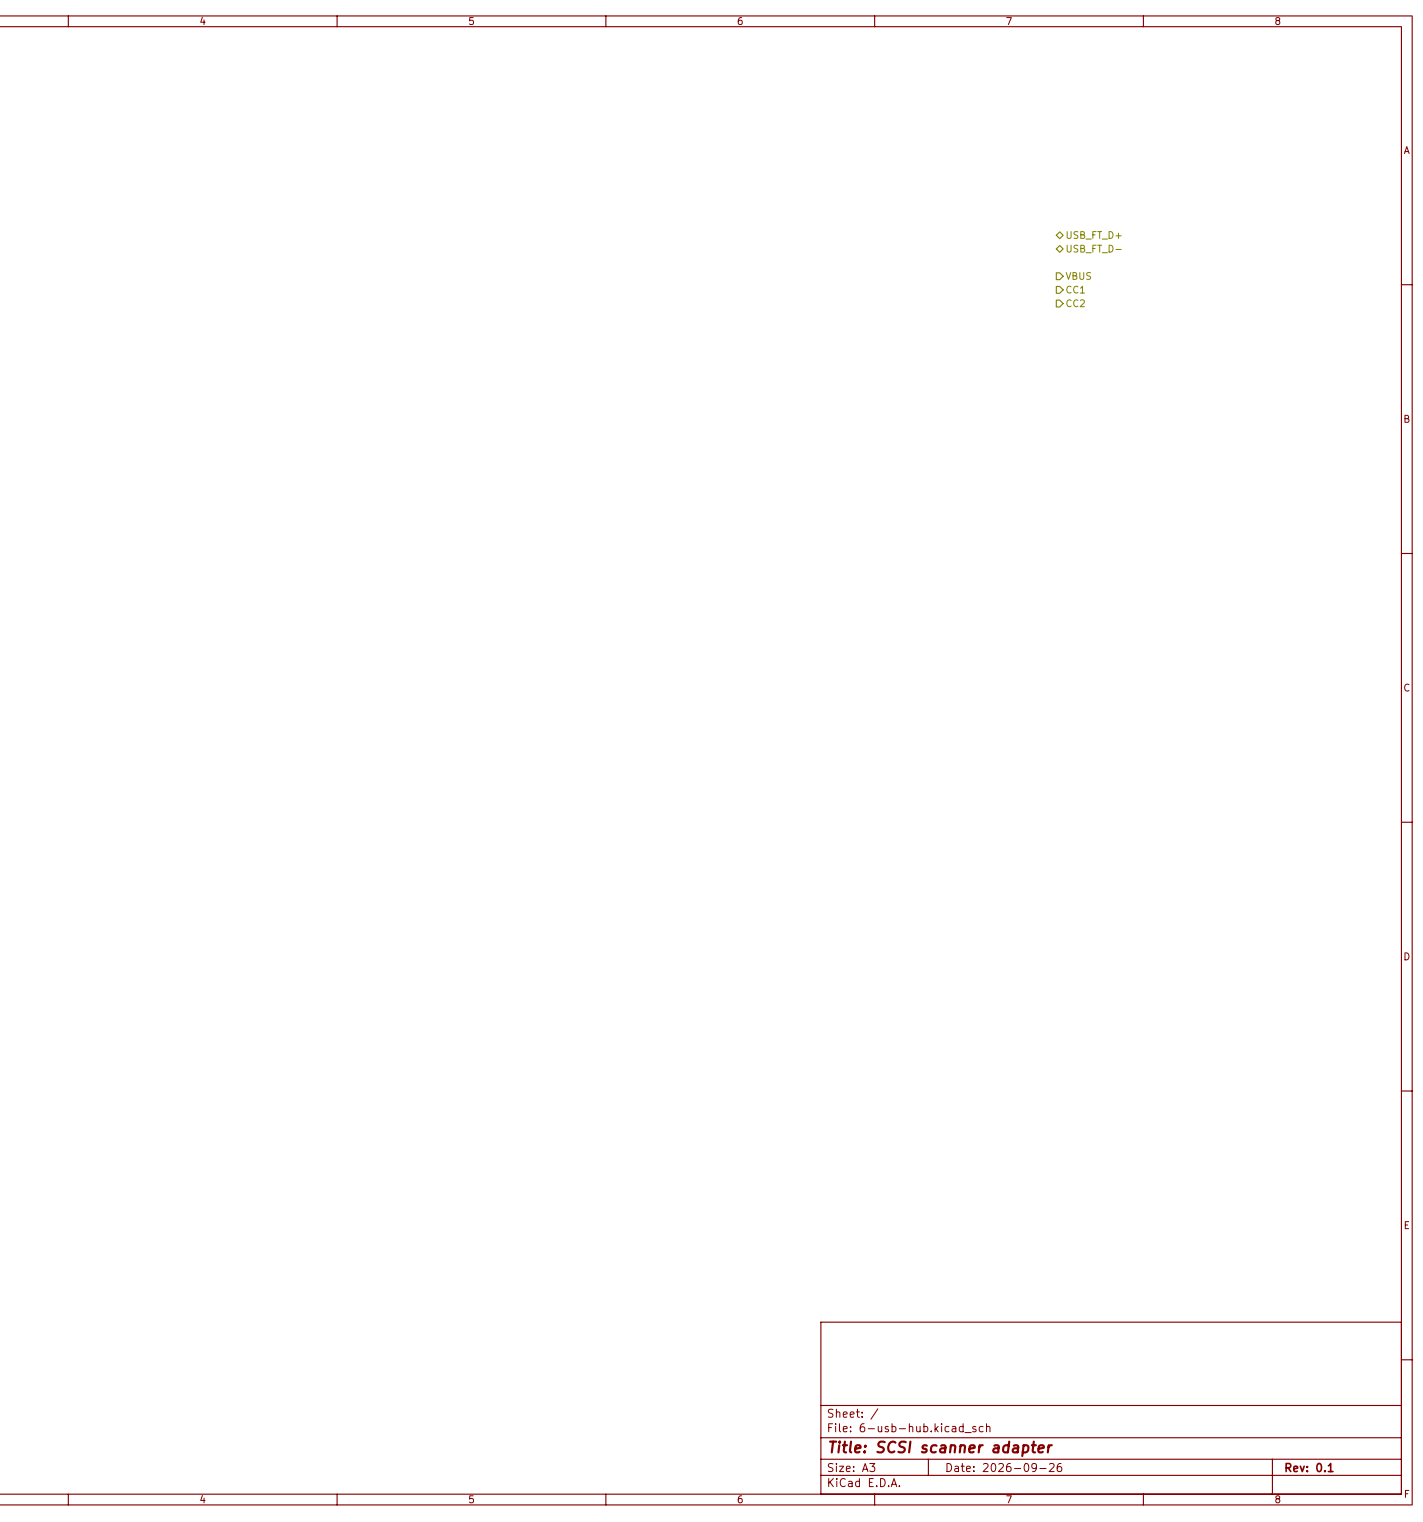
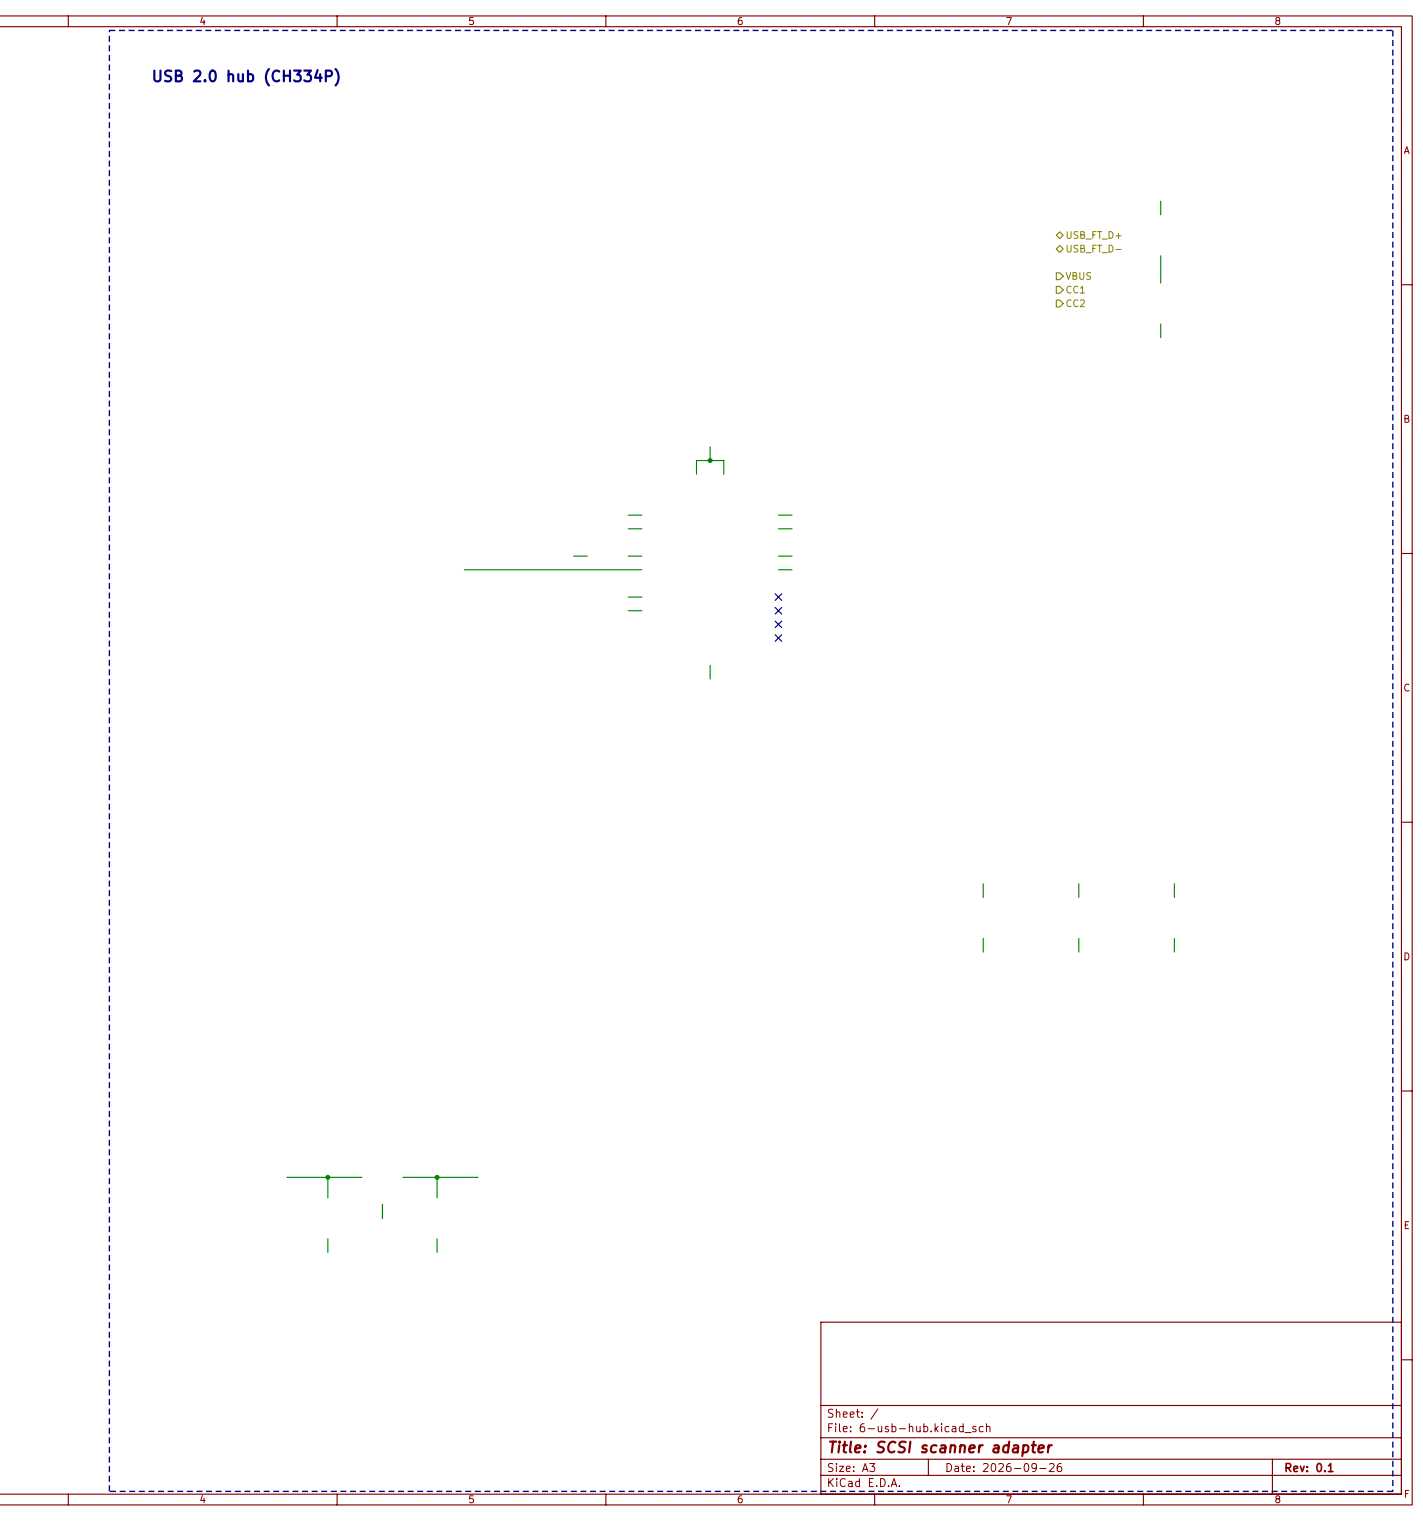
line: none -> (109, 30) (1392, 30) (1392, 1491) (109, 1491) (109, 30)
text: none -> USB 2.0 hub (CH334P) (246, 77)
wire: none -> (1160, 201) (1160, 214)
wire: none -> (1160, 255) (1160, 283)
wire: none -> (1160, 324) (1160, 337)
wire: none -> (710, 446) (710, 460)
junction: none -> (710, 460)
wire: none -> (696, 474) (696, 460) (723, 460) (723, 474)
wire: none -> (628, 515) (641, 515)
wire: none -> (778, 515) (792, 515)
wire: none -> (628, 528) (641, 528)
wire: none -> (778, 528) (792, 528)
wire: none -> (573, 556) (587, 556)
wire: none -> (628, 556) (641, 556)
wire: none -> (778, 556) (792, 556)
wire: none -> (464, 569) (641, 569)
wire: none -> (778, 569) (792, 569)
wire: none -> (628, 597) (641, 597)
no-connect mark: none -> (778, 597)
wire: none -> (628, 610) (641, 610)
no-connect mark: none -> (778, 610)
no-connect mark: none -> (778, 624)
no-connect mark: none -> (778, 638)
wire: none -> (710, 665) (710, 679)
wire: none -> (983, 883) (983, 897)
wire: none -> (1078, 883) (1078, 897)
wire: none -> (1174, 883) (1174, 897)
wire: none -> (983, 938) (983, 952)
wire: none -> (1078, 938) (1078, 952)
wire: none -> (1174, 938) (1174, 952)
wire: none -> (286, 1177) (361, 1177)
wire: none -> (327, 1177) (327, 1197)
junction: none -> (327, 1177)
wire: none -> (402, 1177) (478, 1177)
wire: none -> (437, 1177) (437, 1197)
junction: none -> (437, 1177)
wire: none -> (382, 1204) (382, 1218)
wire: none -> (327, 1238) (327, 1252)
wire: none -> (437, 1238) (437, 1252)

